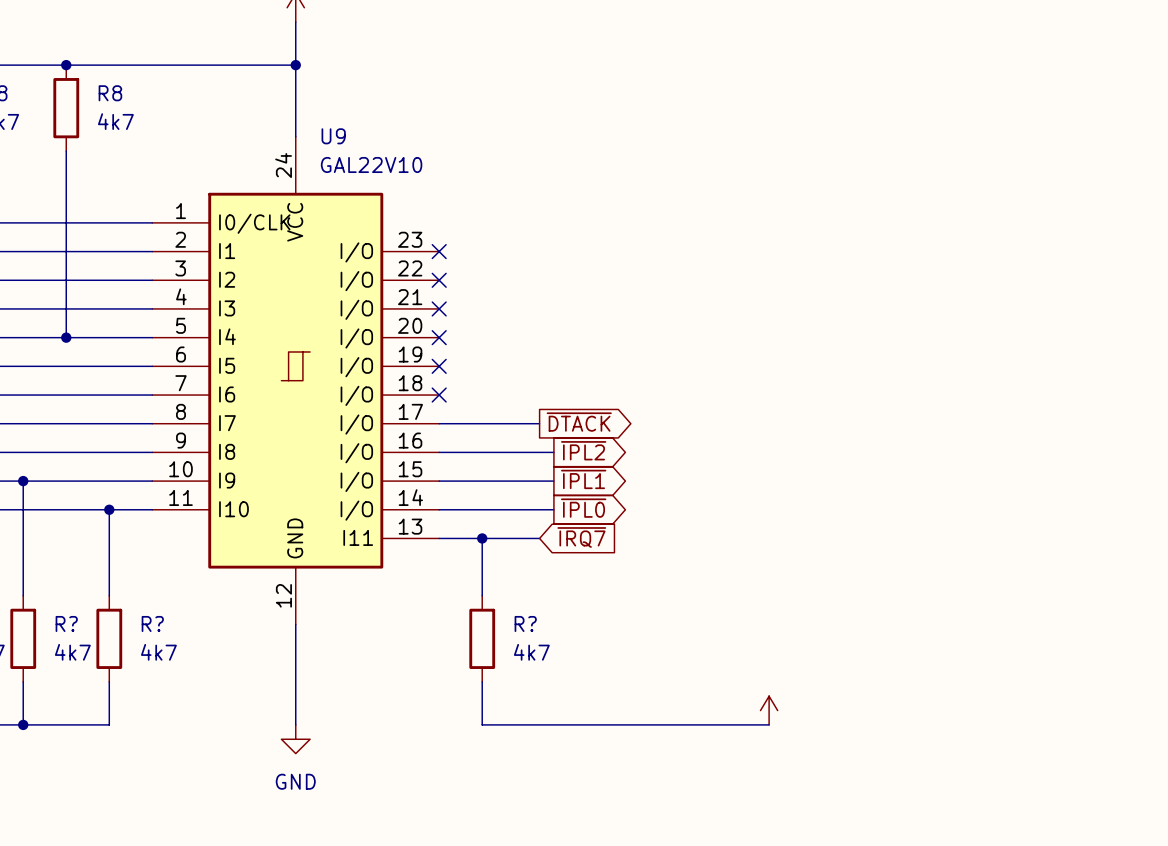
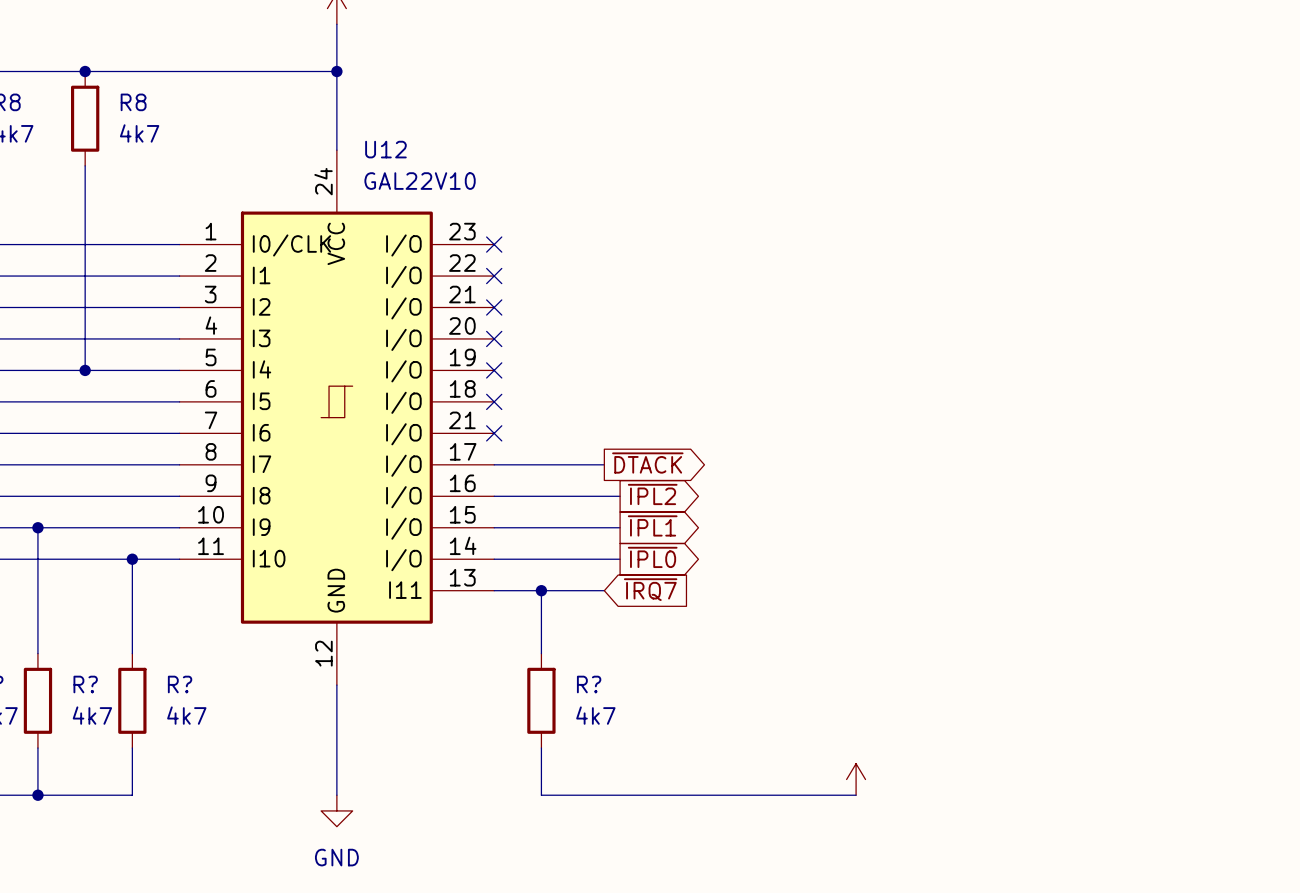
no-connect mark: none -> (494, 244)
U9: GAL22V10 (295, 380) -> none
U12: none -> GAL22V10 (336, 417)

